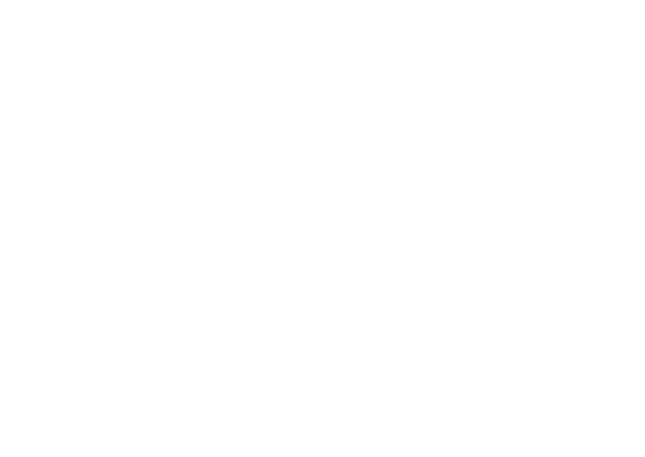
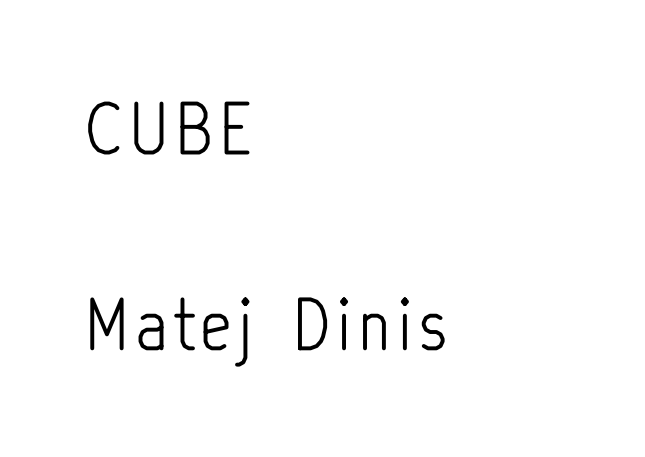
text: none -> CUBE (168, 128)
text: none -> Matej Dinis (267, 332)

